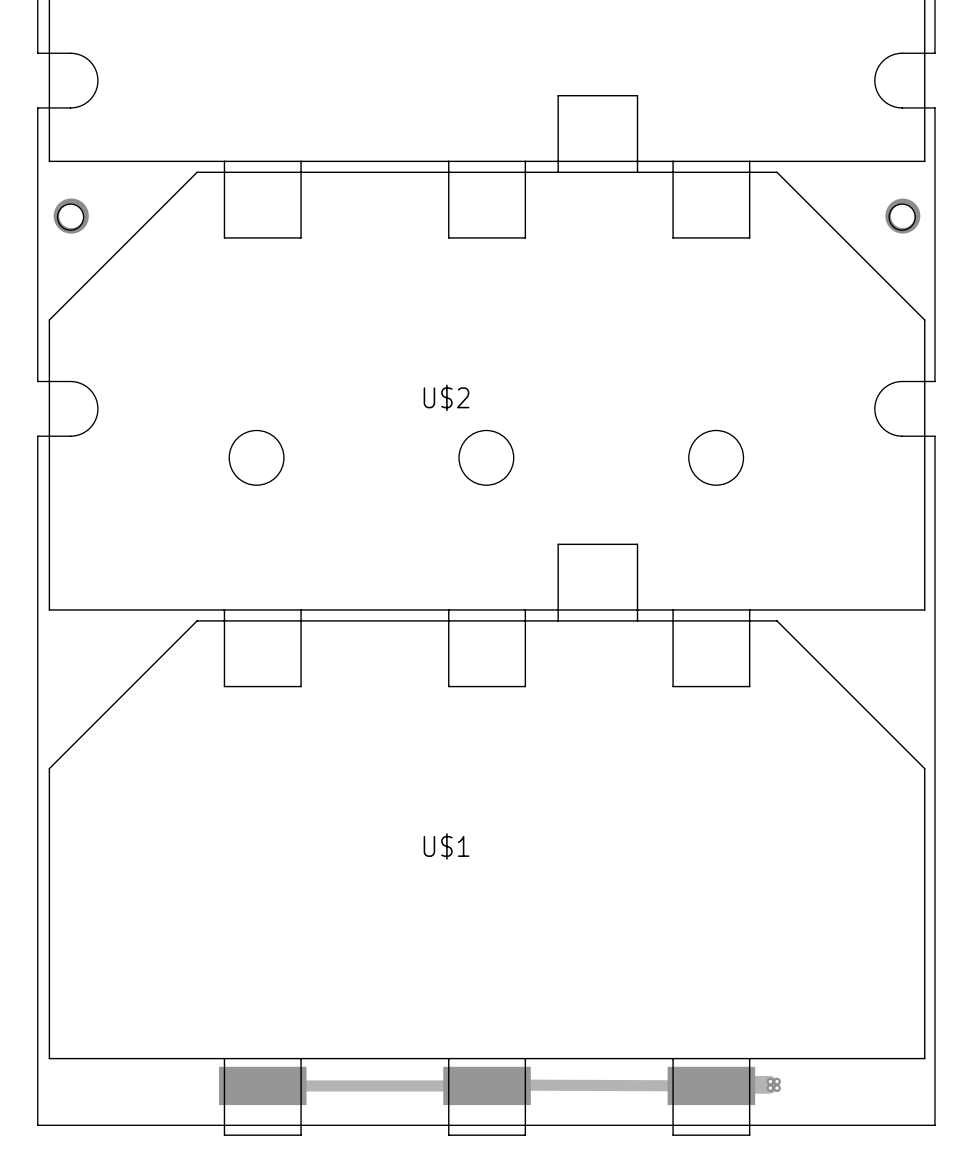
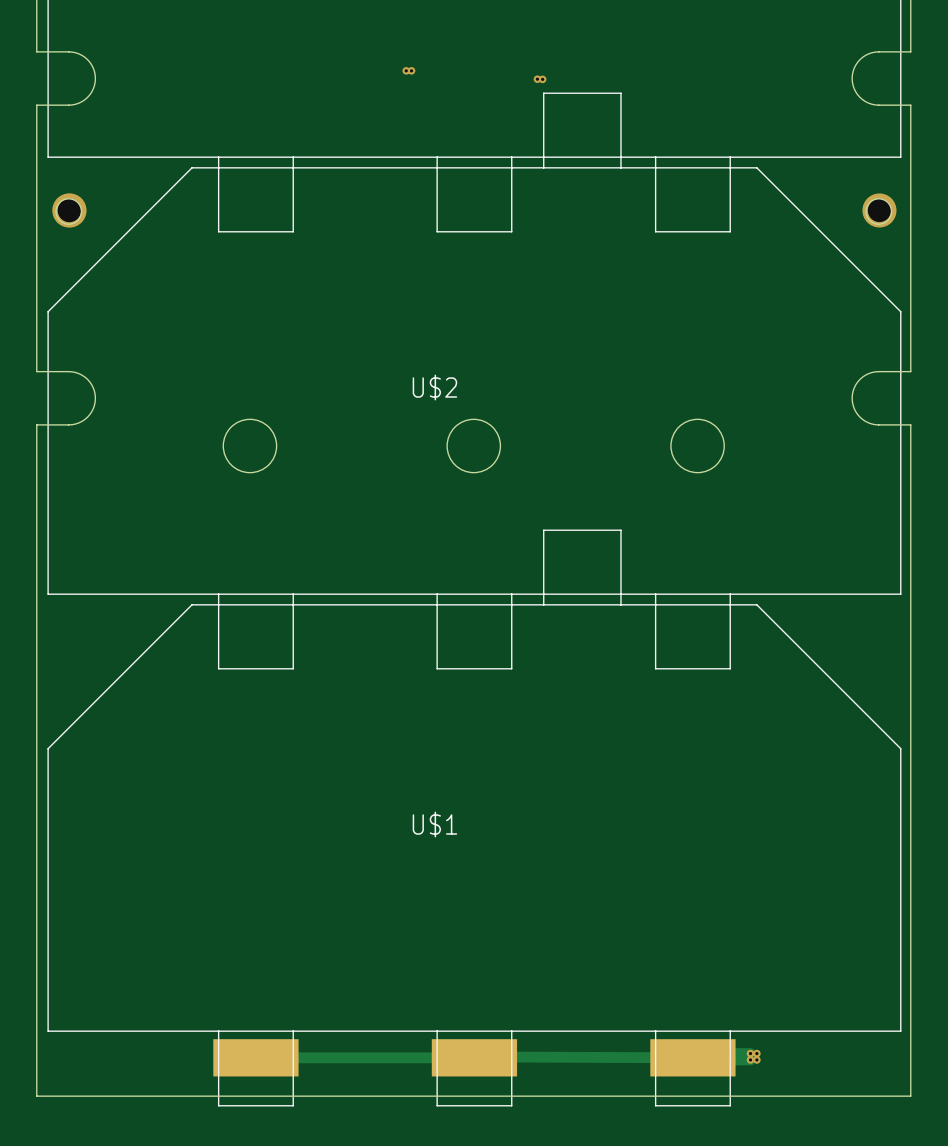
via: none -> (406, 70)
via: none -> (411, 70)
via: none -> (537, 79)
via: none -> (542, 79)

